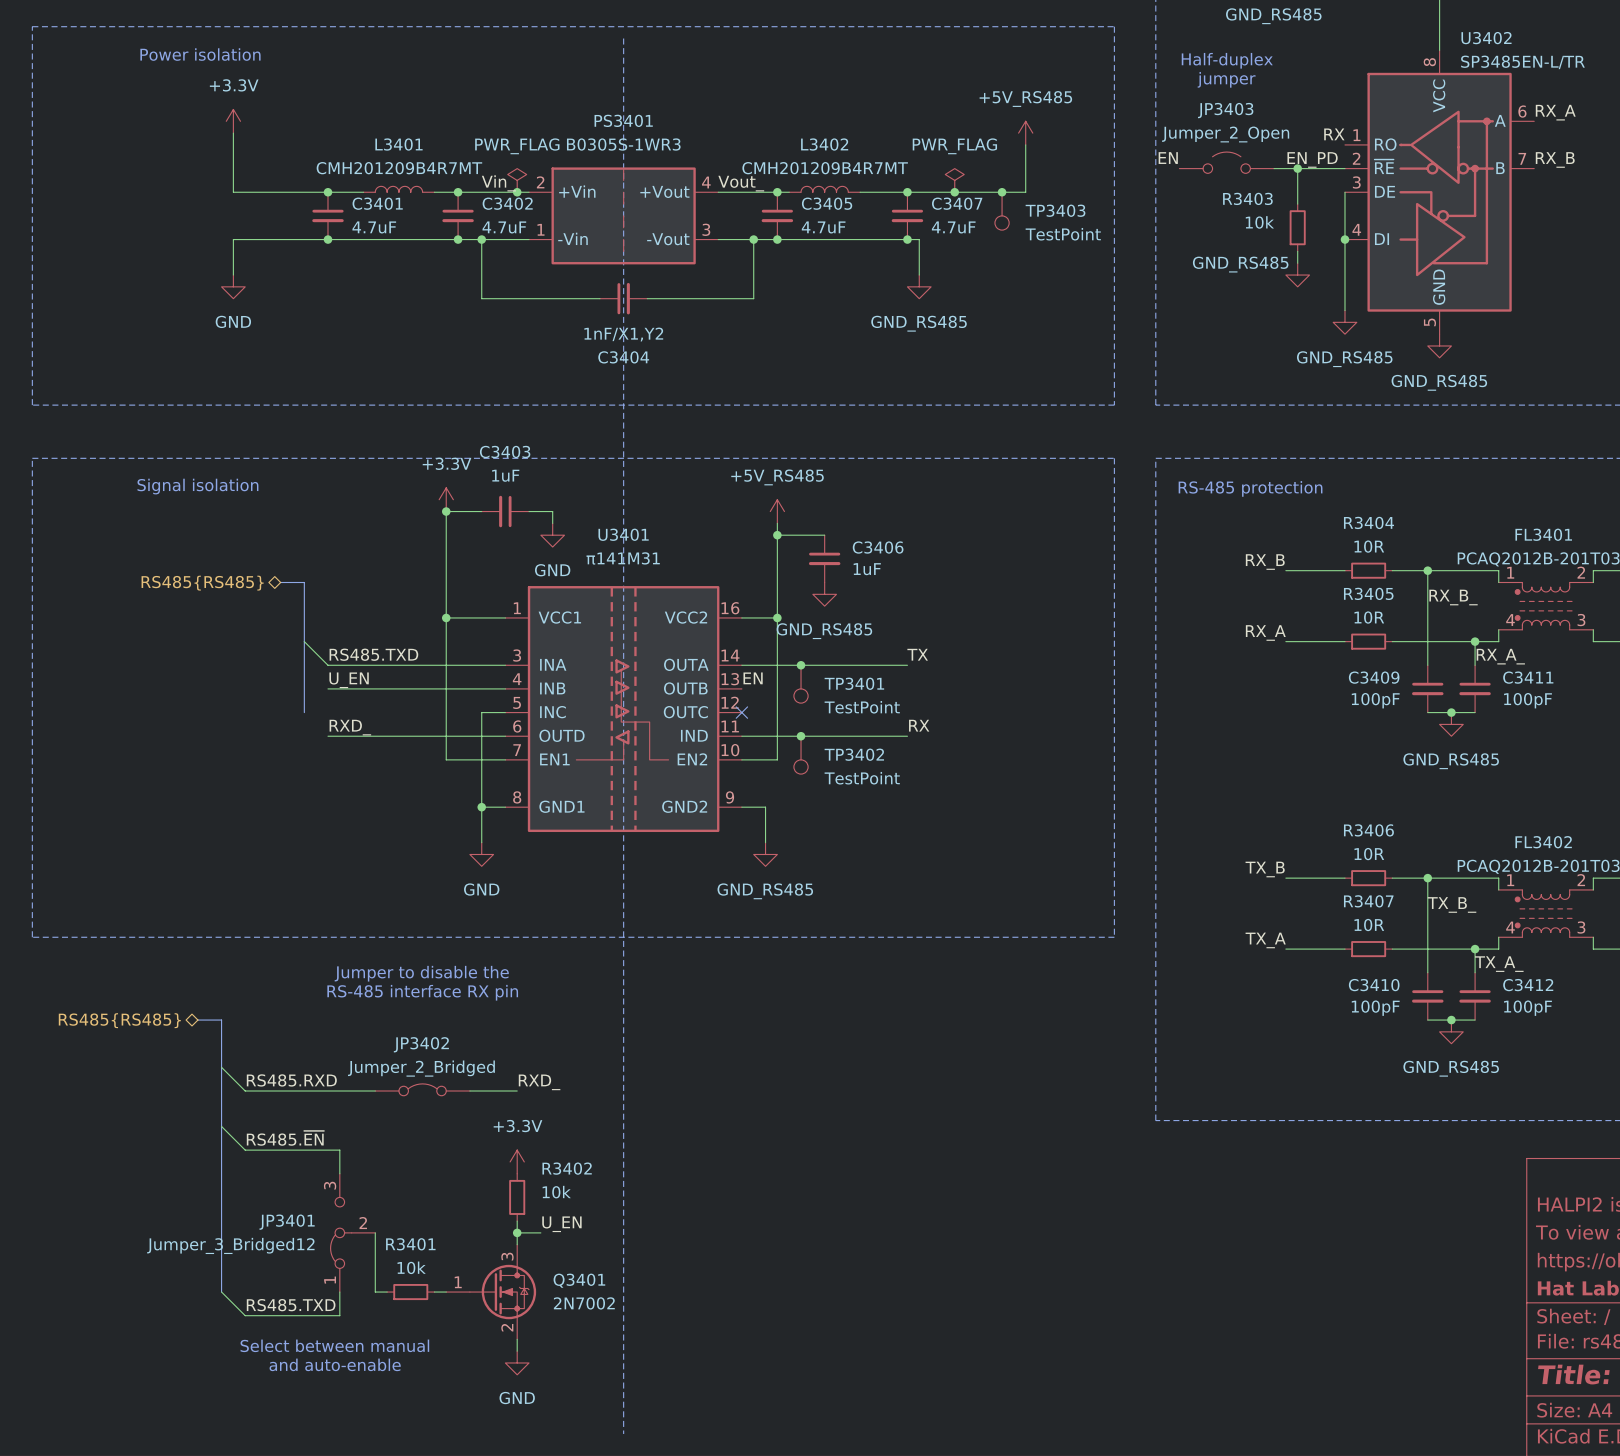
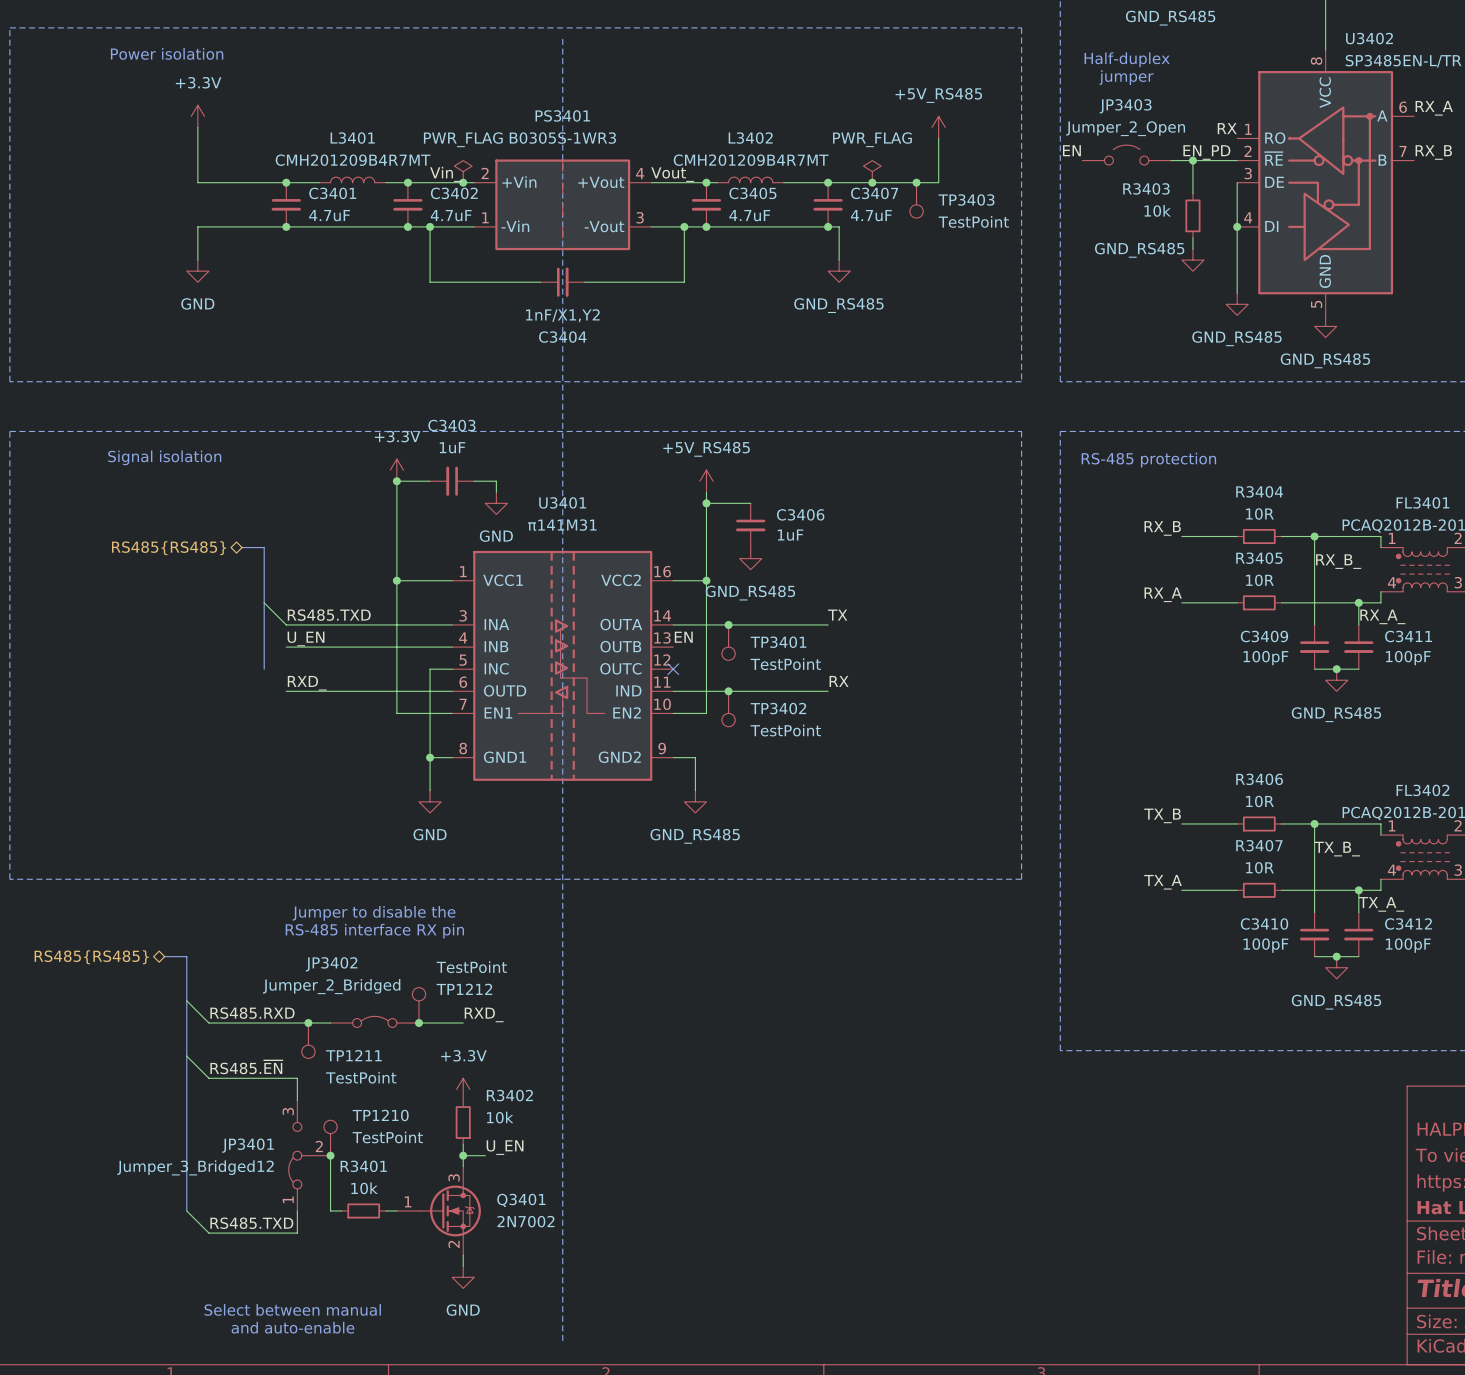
JP3402 name position: JP3402 (421, 1044) -> JP3402 (331, 964)
JP3402 value position: Jumper_2_Bridged (421, 1068) -> Jumper_2_Bridged (331, 986)
TP1212: none -> TestPoint (418, 1005)
junction: none -> (308, 1023)
junction: none -> (418, 1023)
TP1211: none -> TestPoint (308, 1040)
TP1210: none -> TestPoint (330, 1138)
junction: none -> (330, 1155)
text position: Select between manual (334, 1345) -> Select between manual (292, 1309)
text position: and auto-enable (335, 1364) -> and auto-enable (292, 1327)

